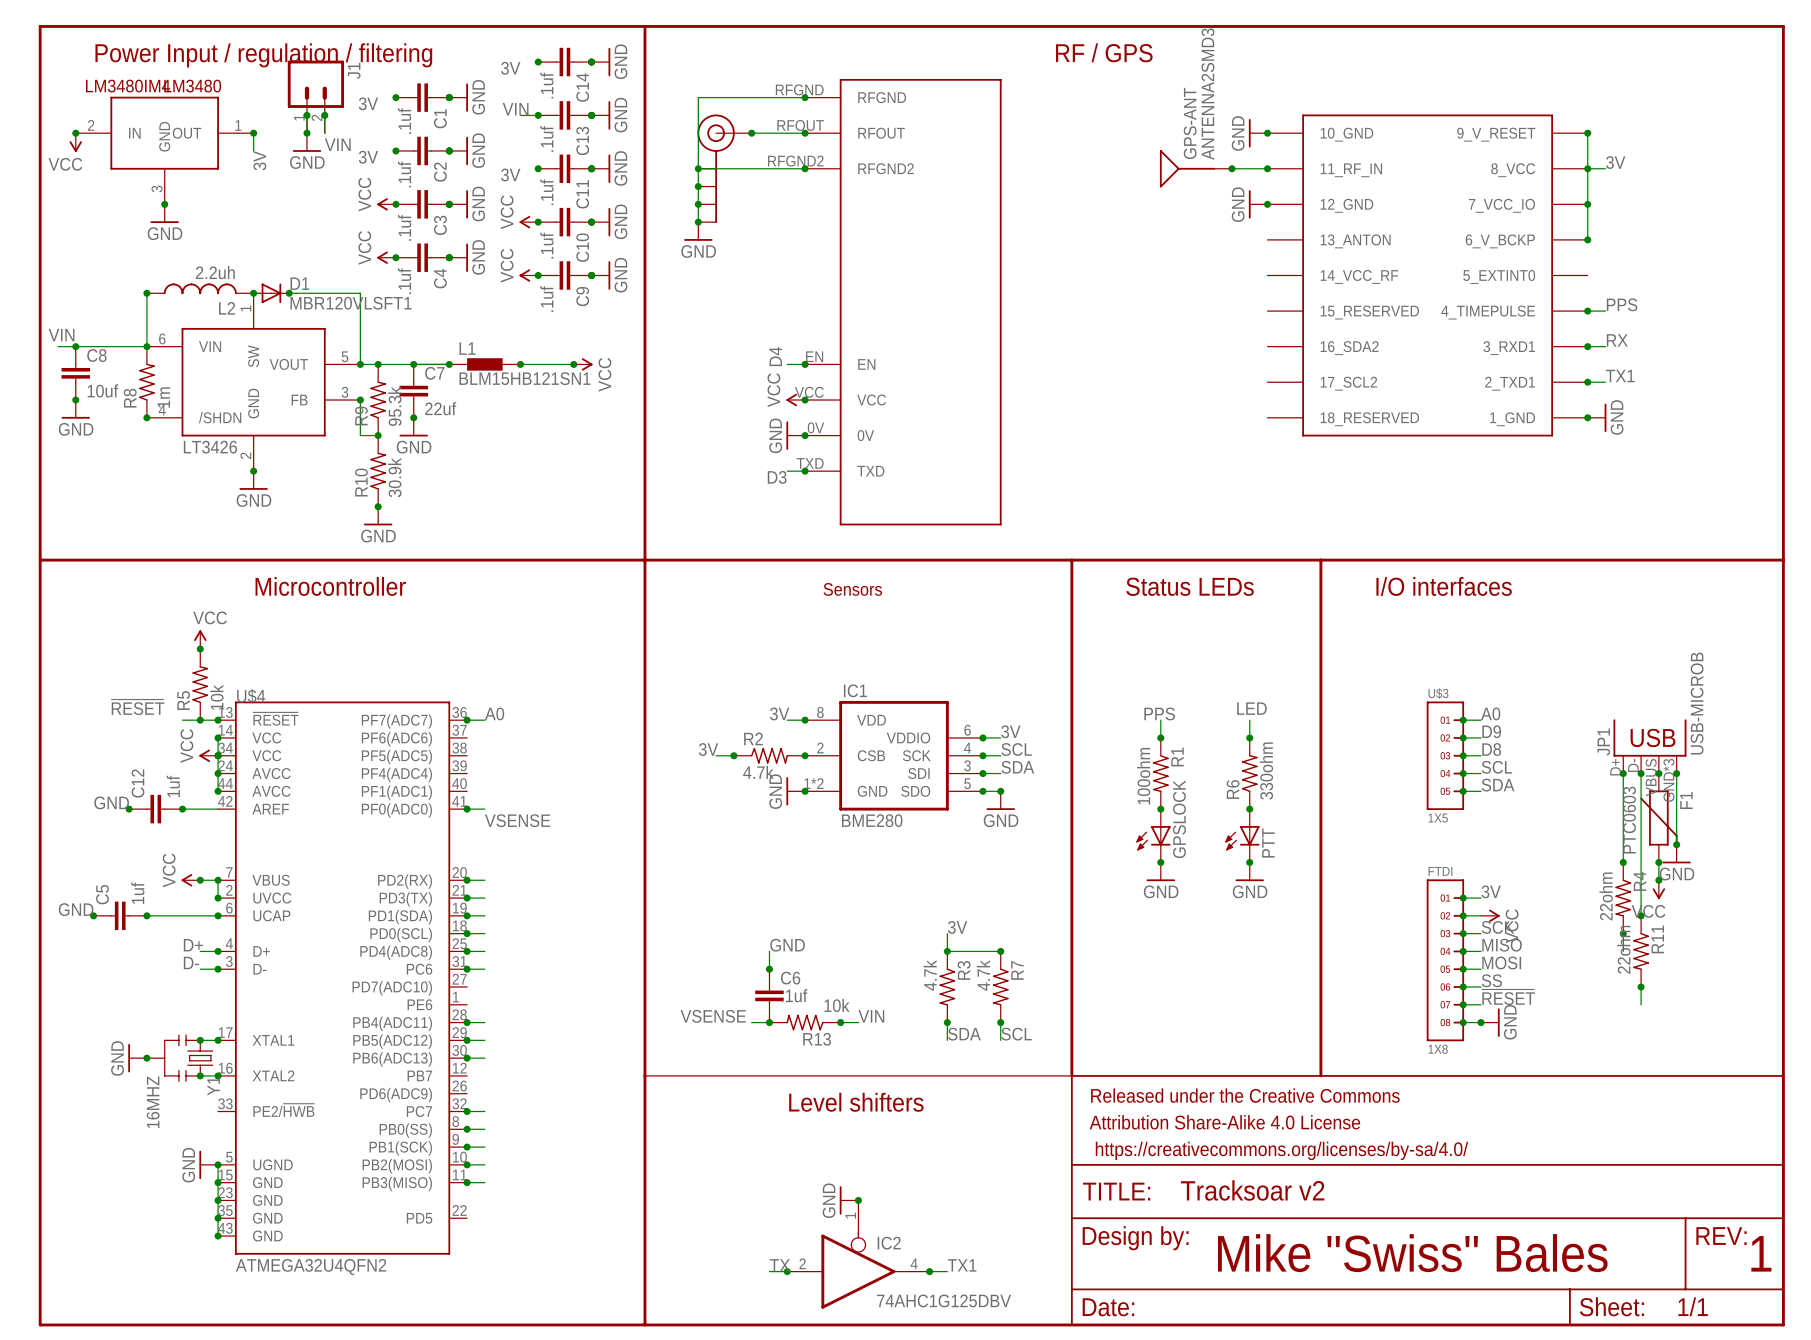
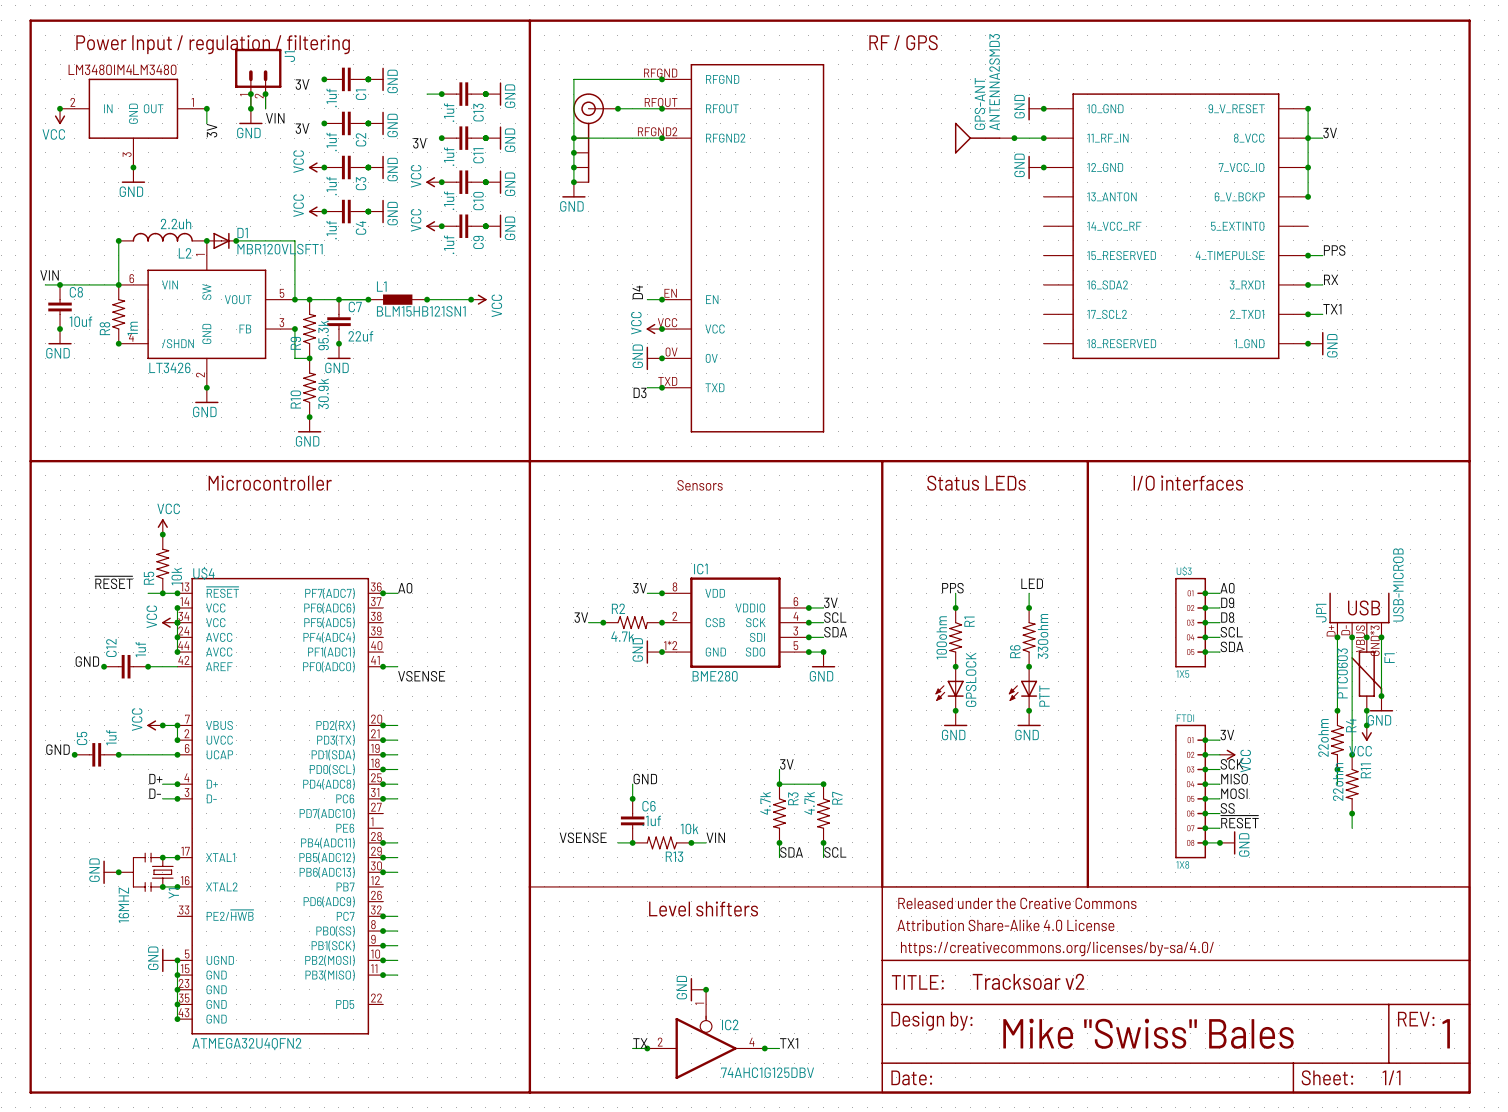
junction: (538, 62) -> none
C14: .1uf (564, 62) -> none
junction: (591, 62) -> none
power symbol: GND (600, 62) -> none
label: 3V (510, 68) -> none
label: VIN (515, 109) -> none

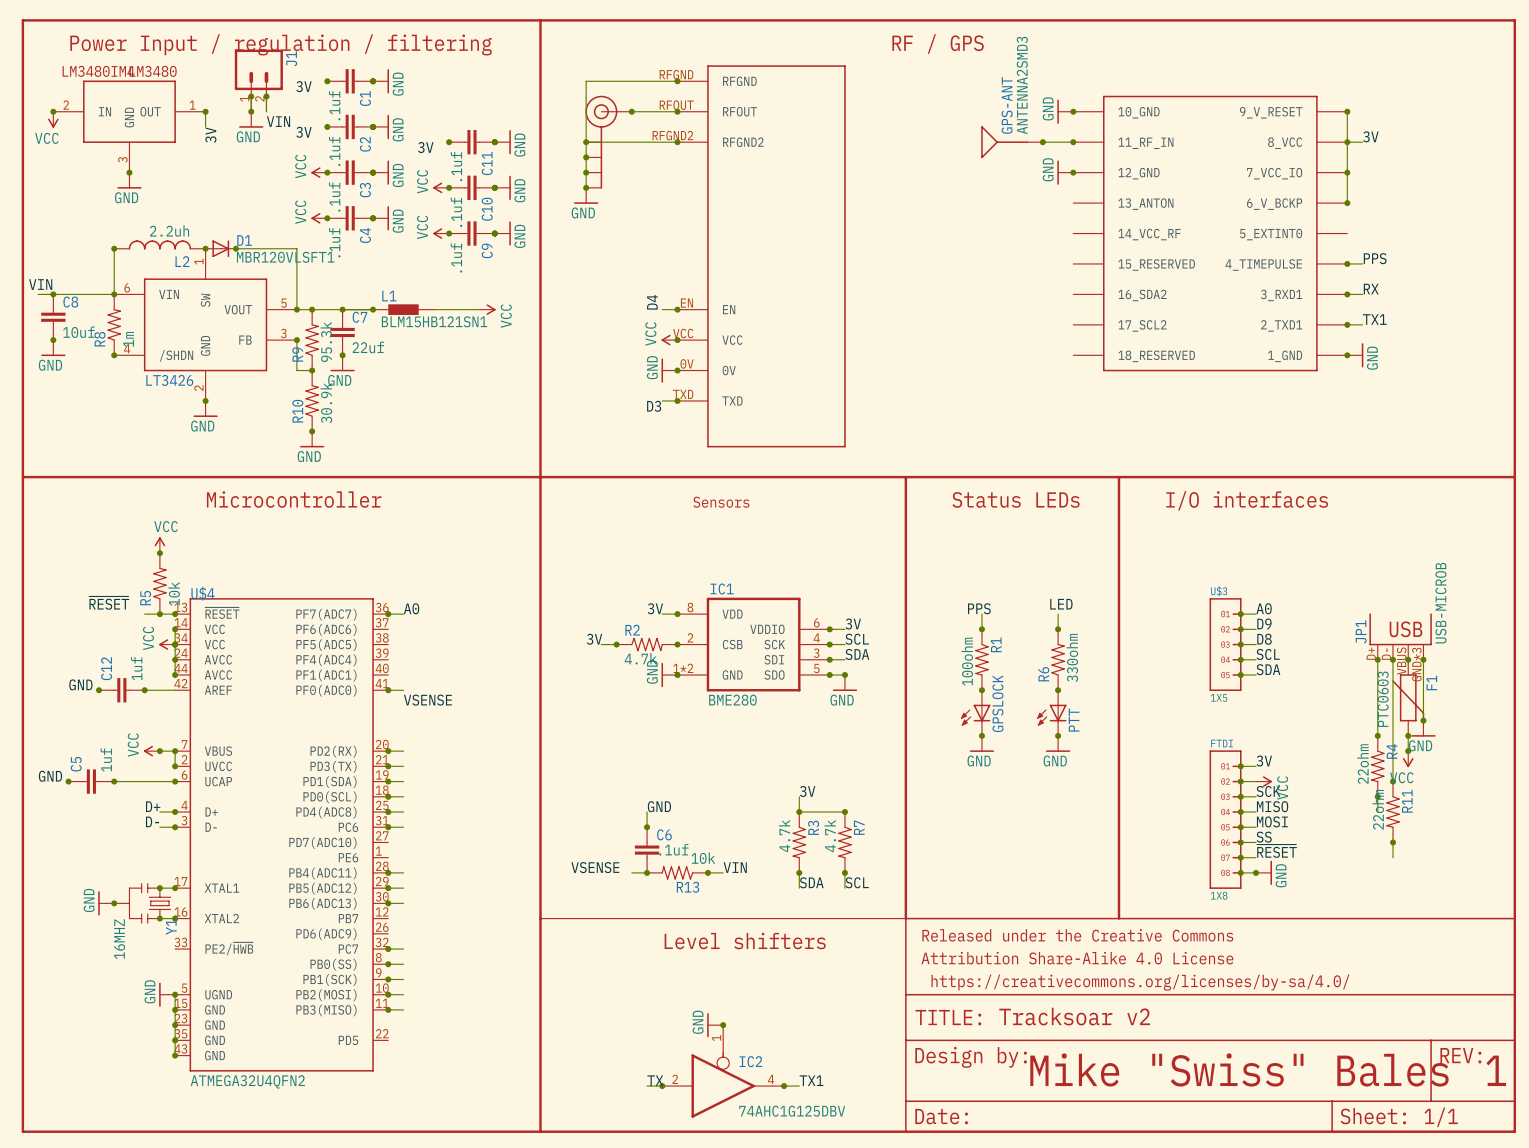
wire: (427, 94) (441, 94) -> none
junction: (441, 94) -> none
C13: .1uf (463, 94) -> none
junction: (485, 94) -> none
power symbol: GND (493, 94) -> none
junction: (427, 299) -> none
junction: (471, 299) -> none

